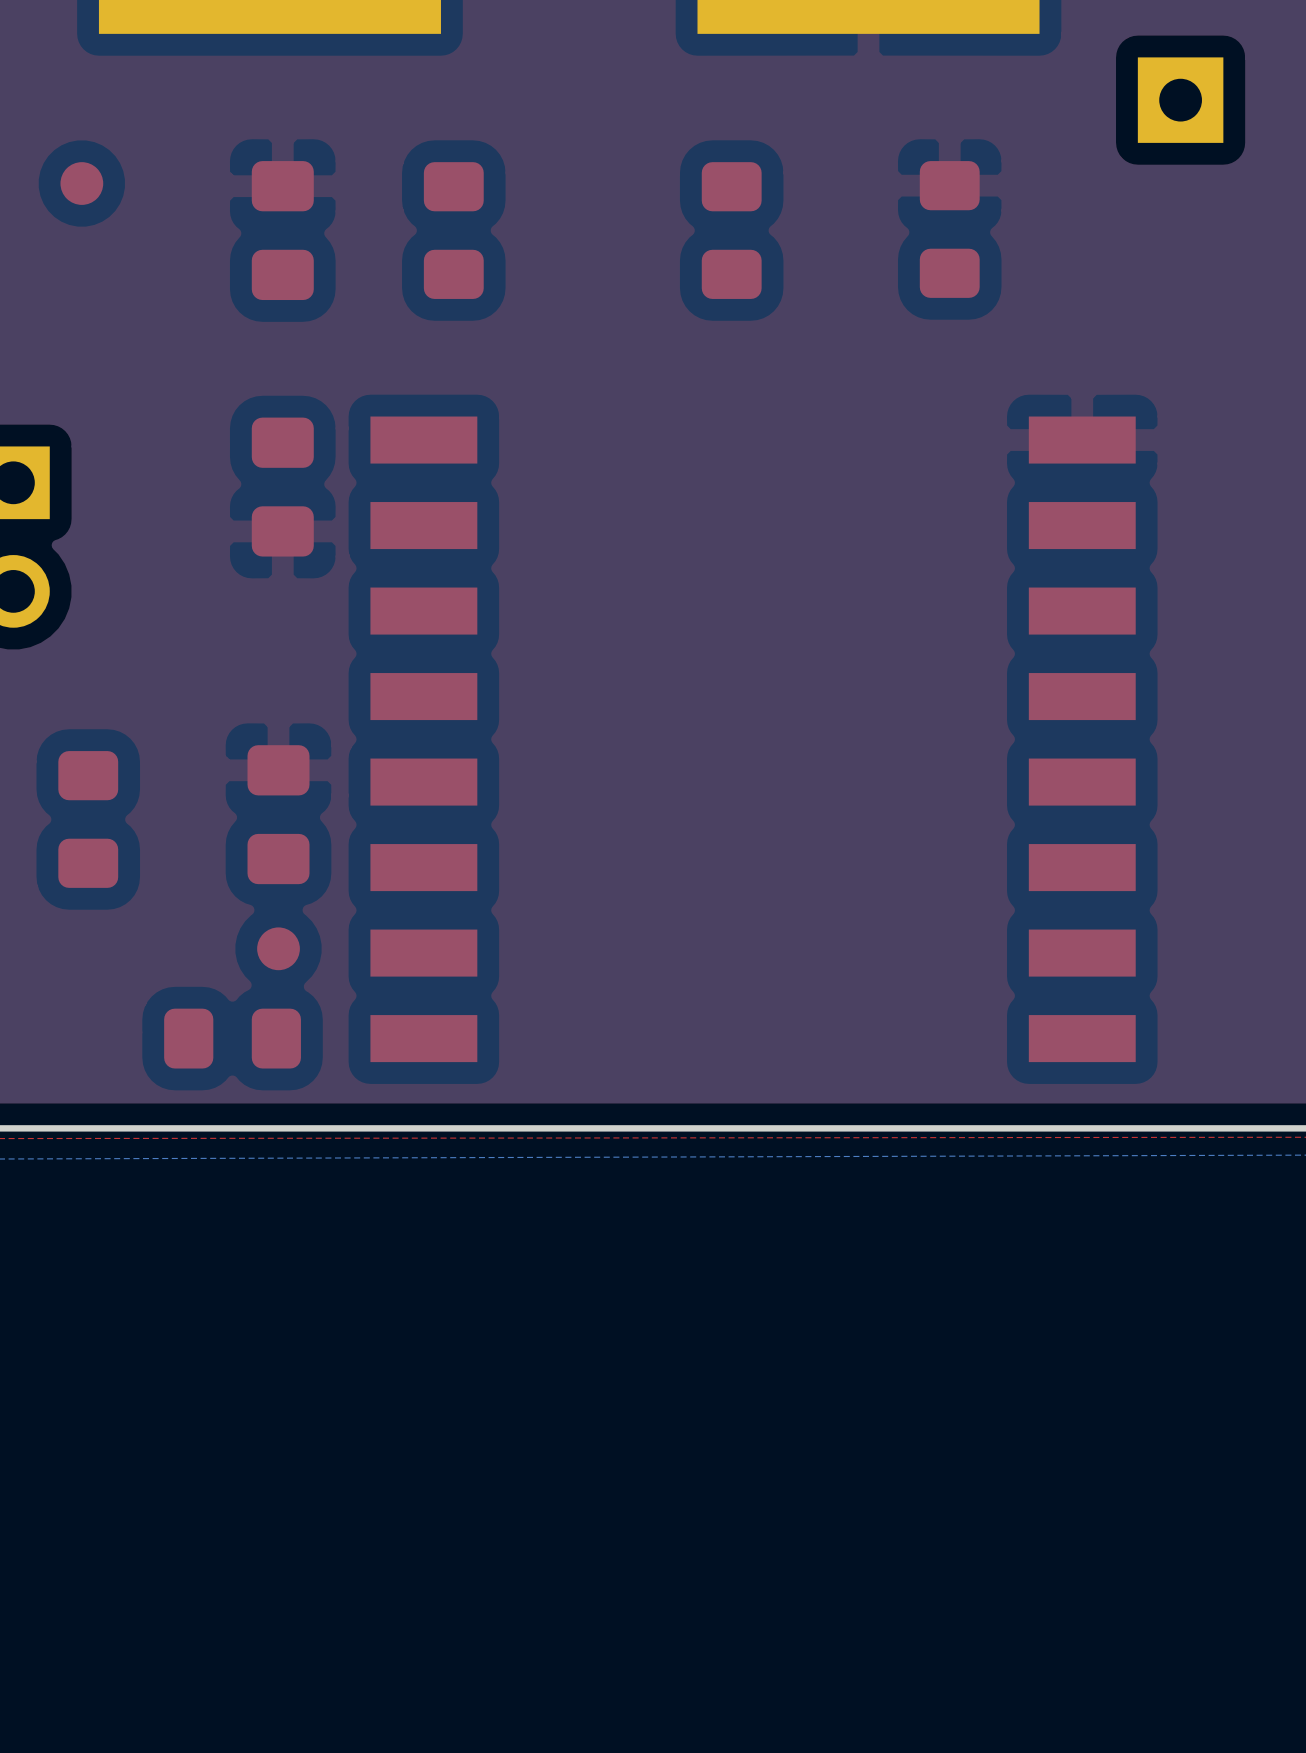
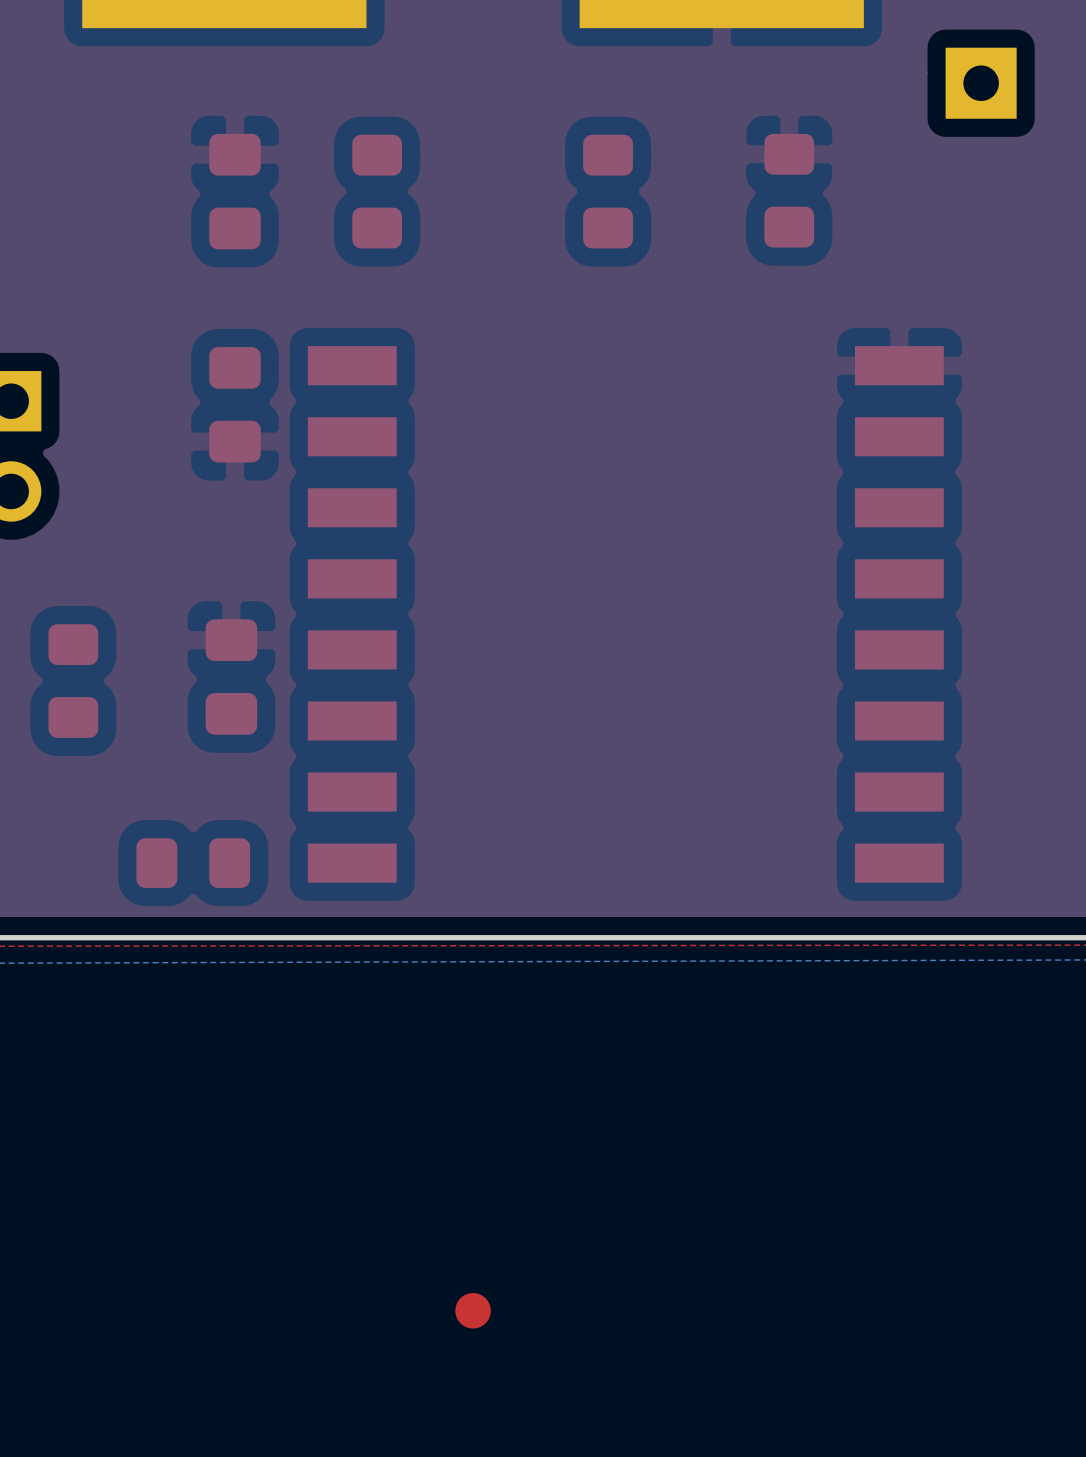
part: (81, 183) -> none
part position: (278, 948) -> (473, 1310)

